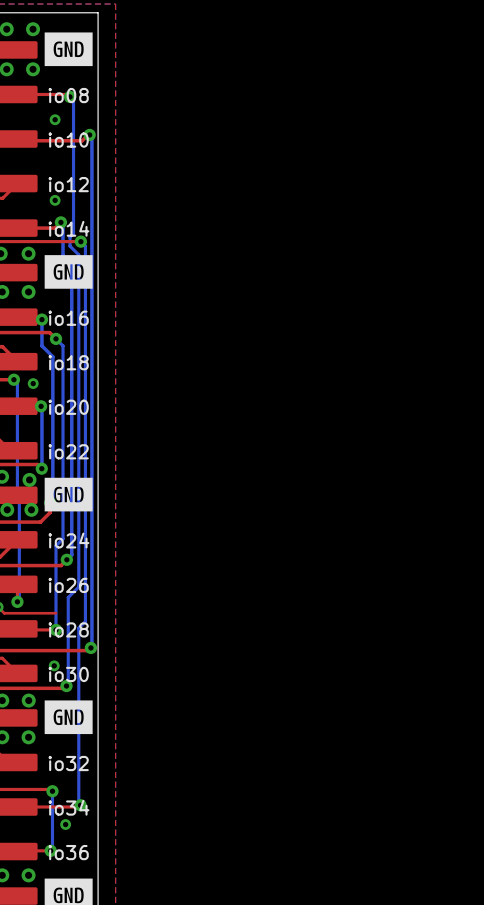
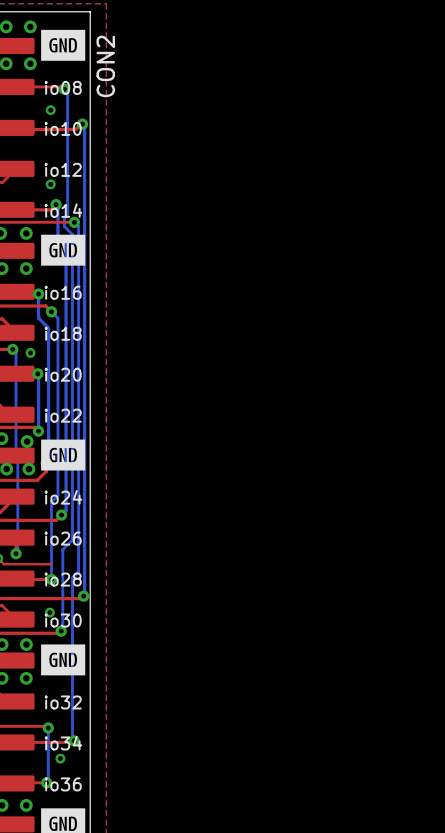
CON2 name: none -> CON2 (105, 66)

